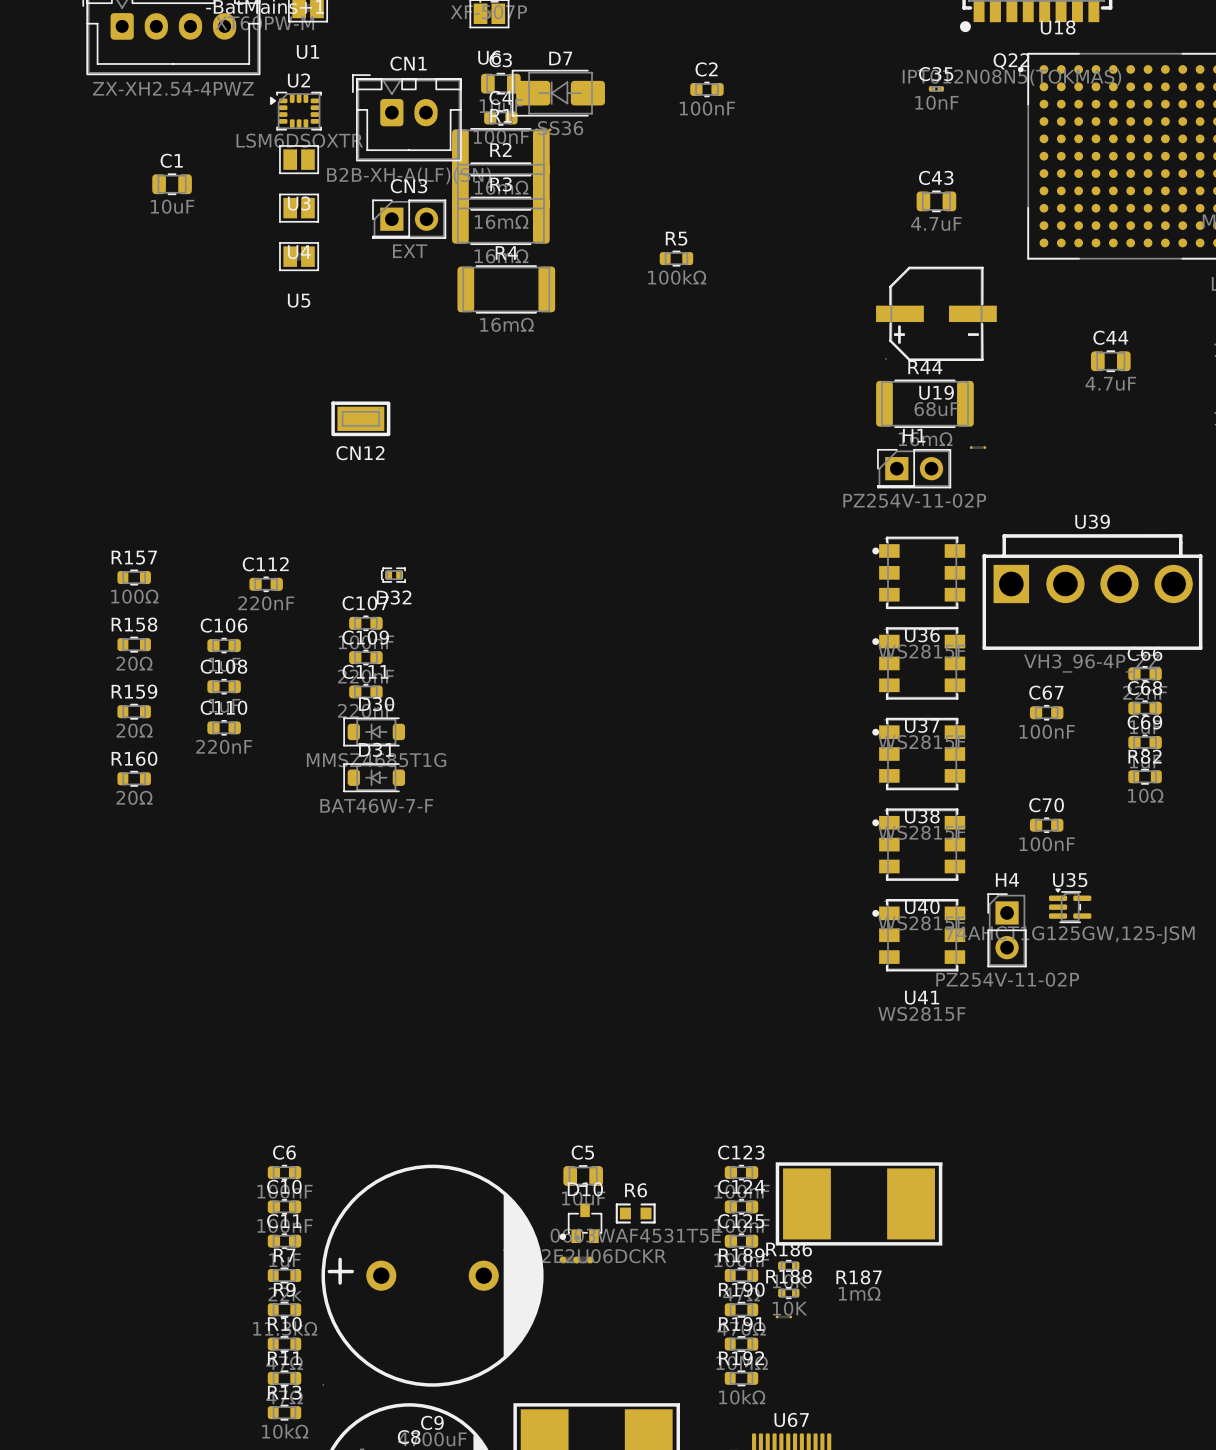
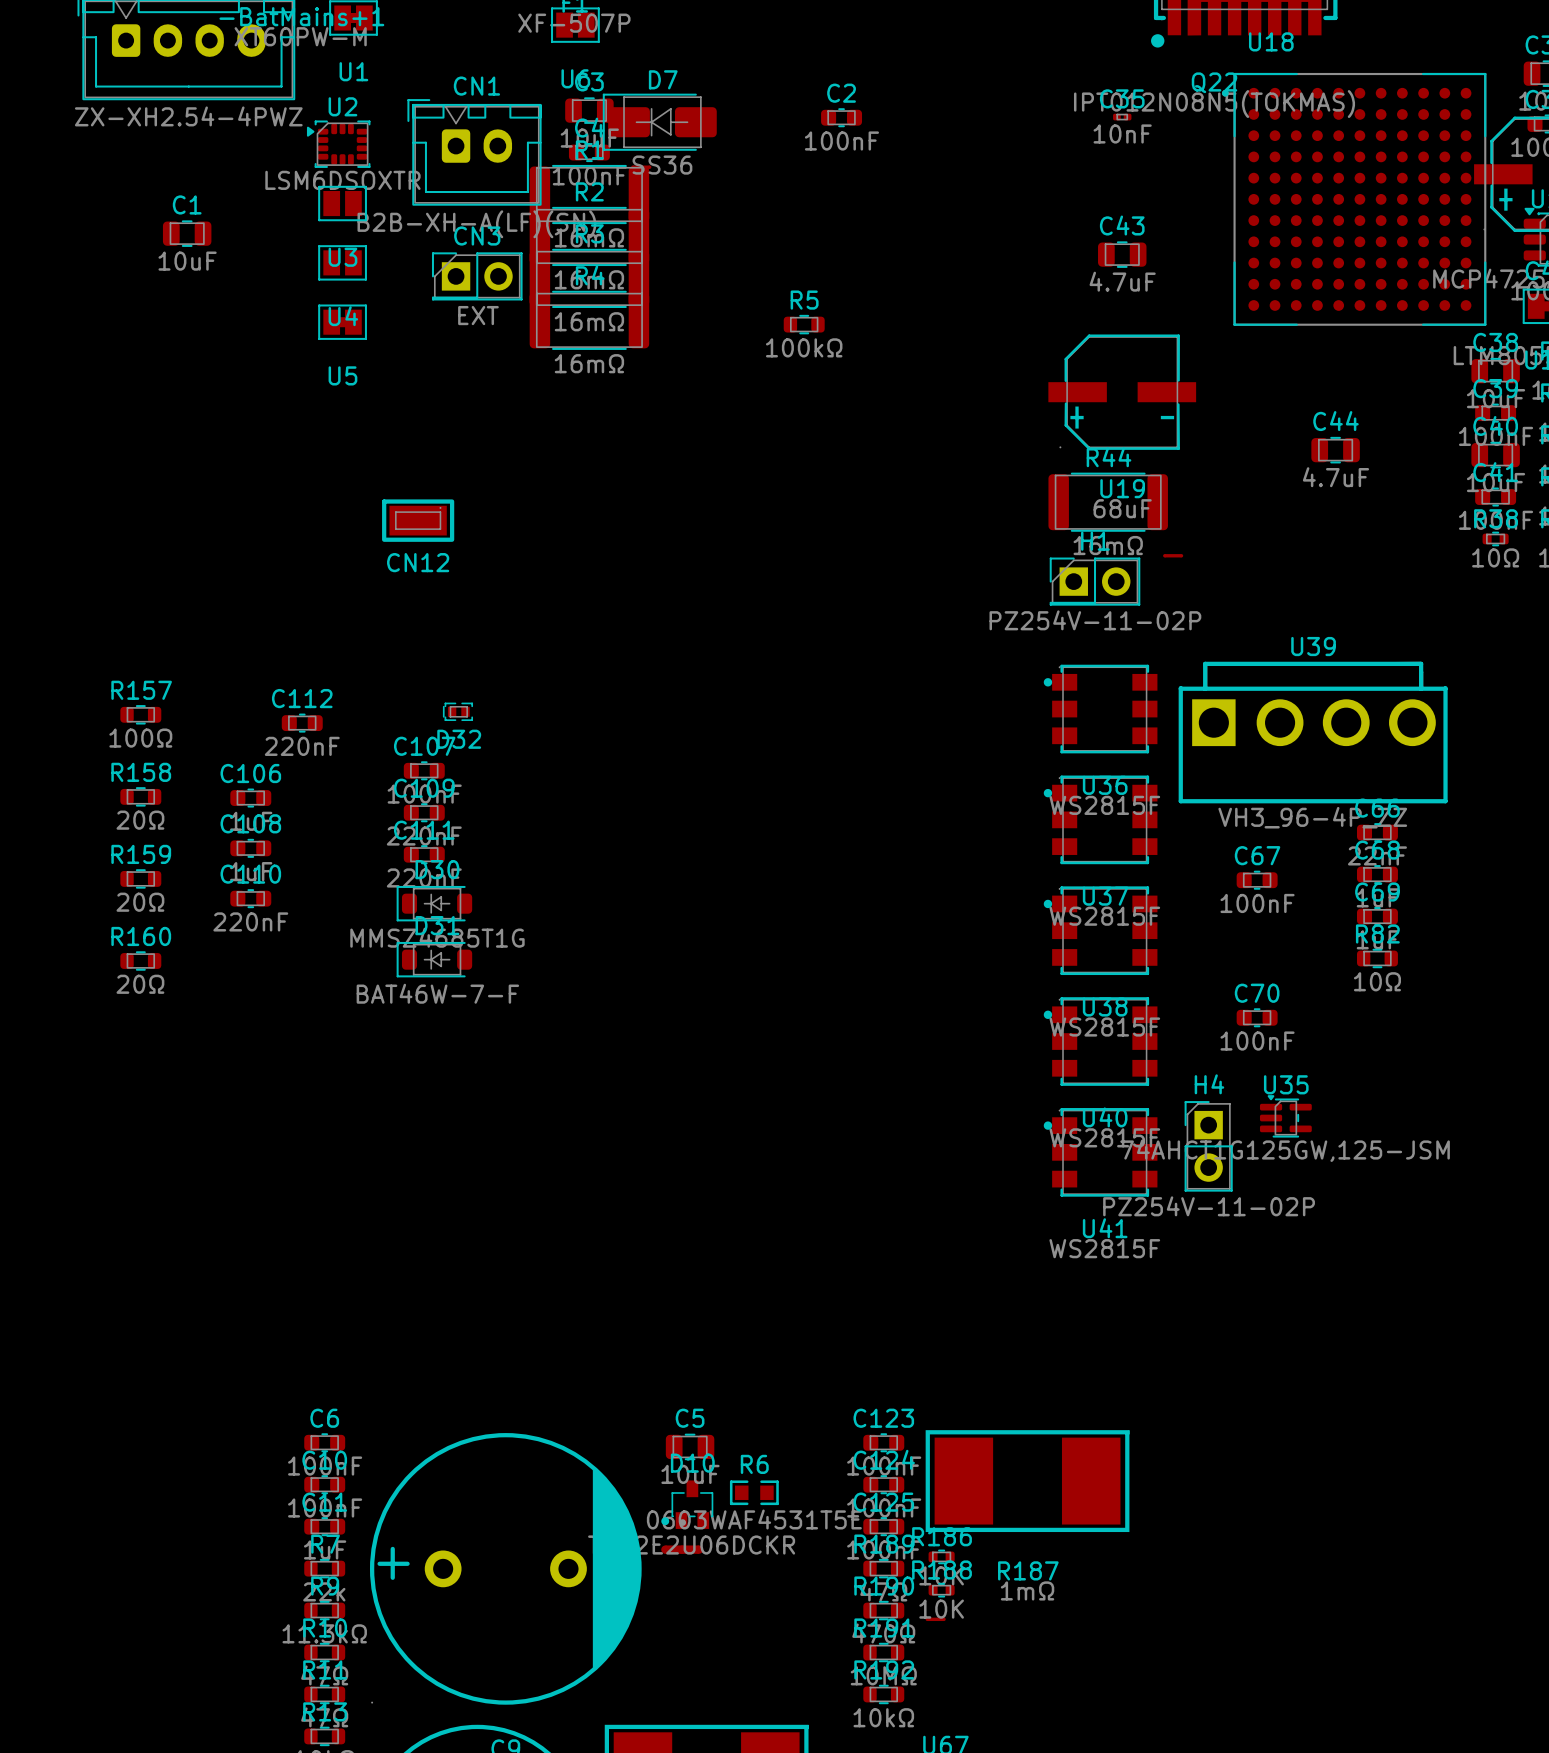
R4 position: (506, 289) -> (589, 320)

